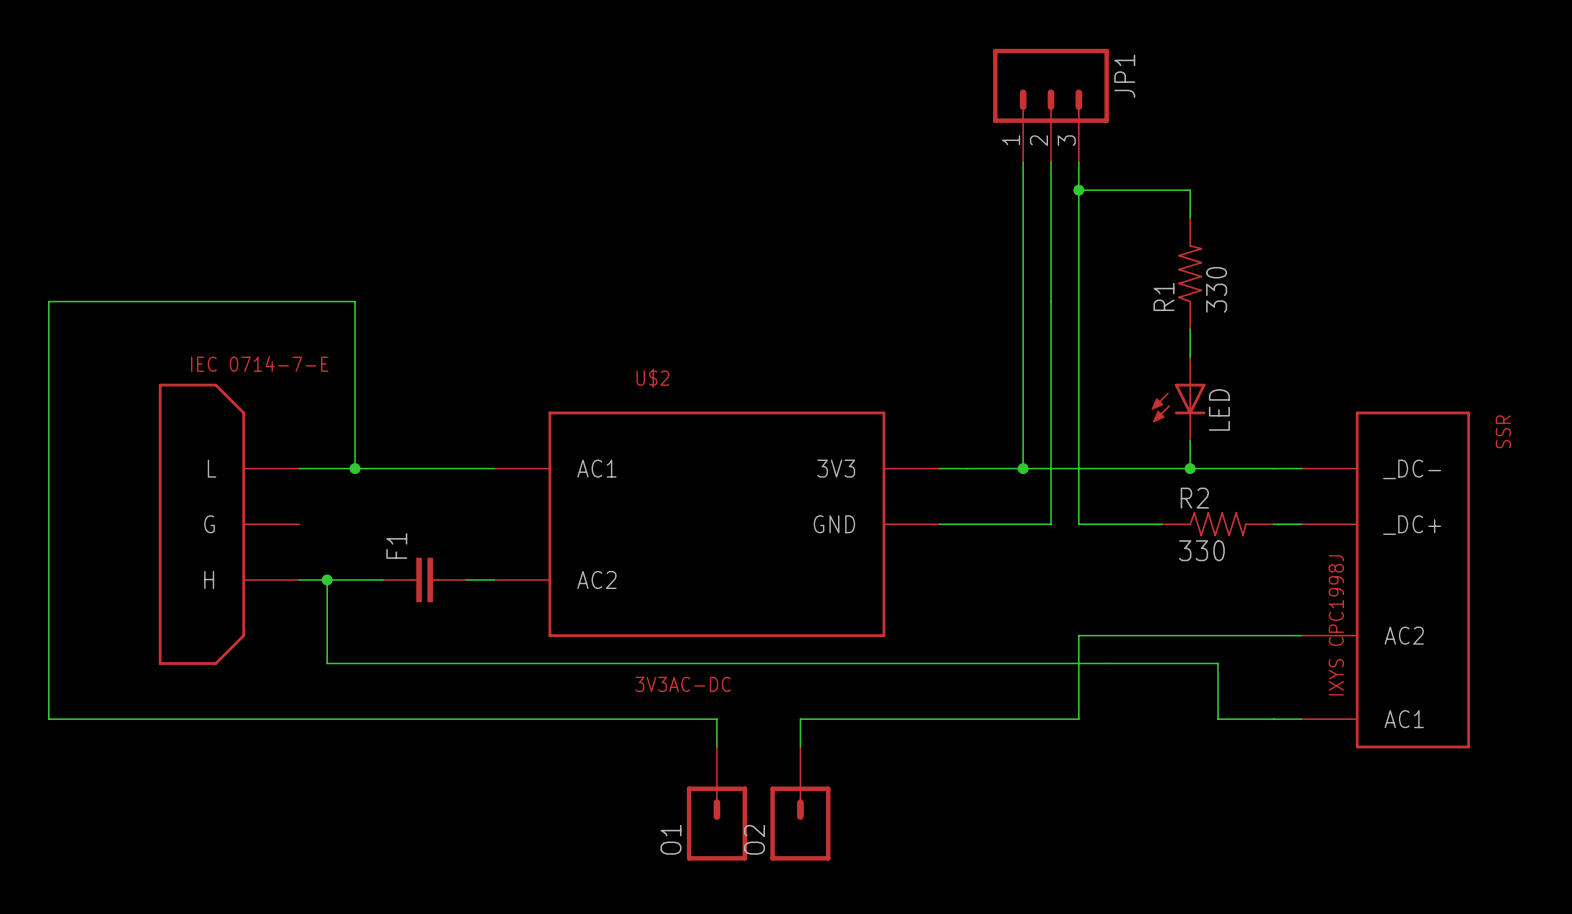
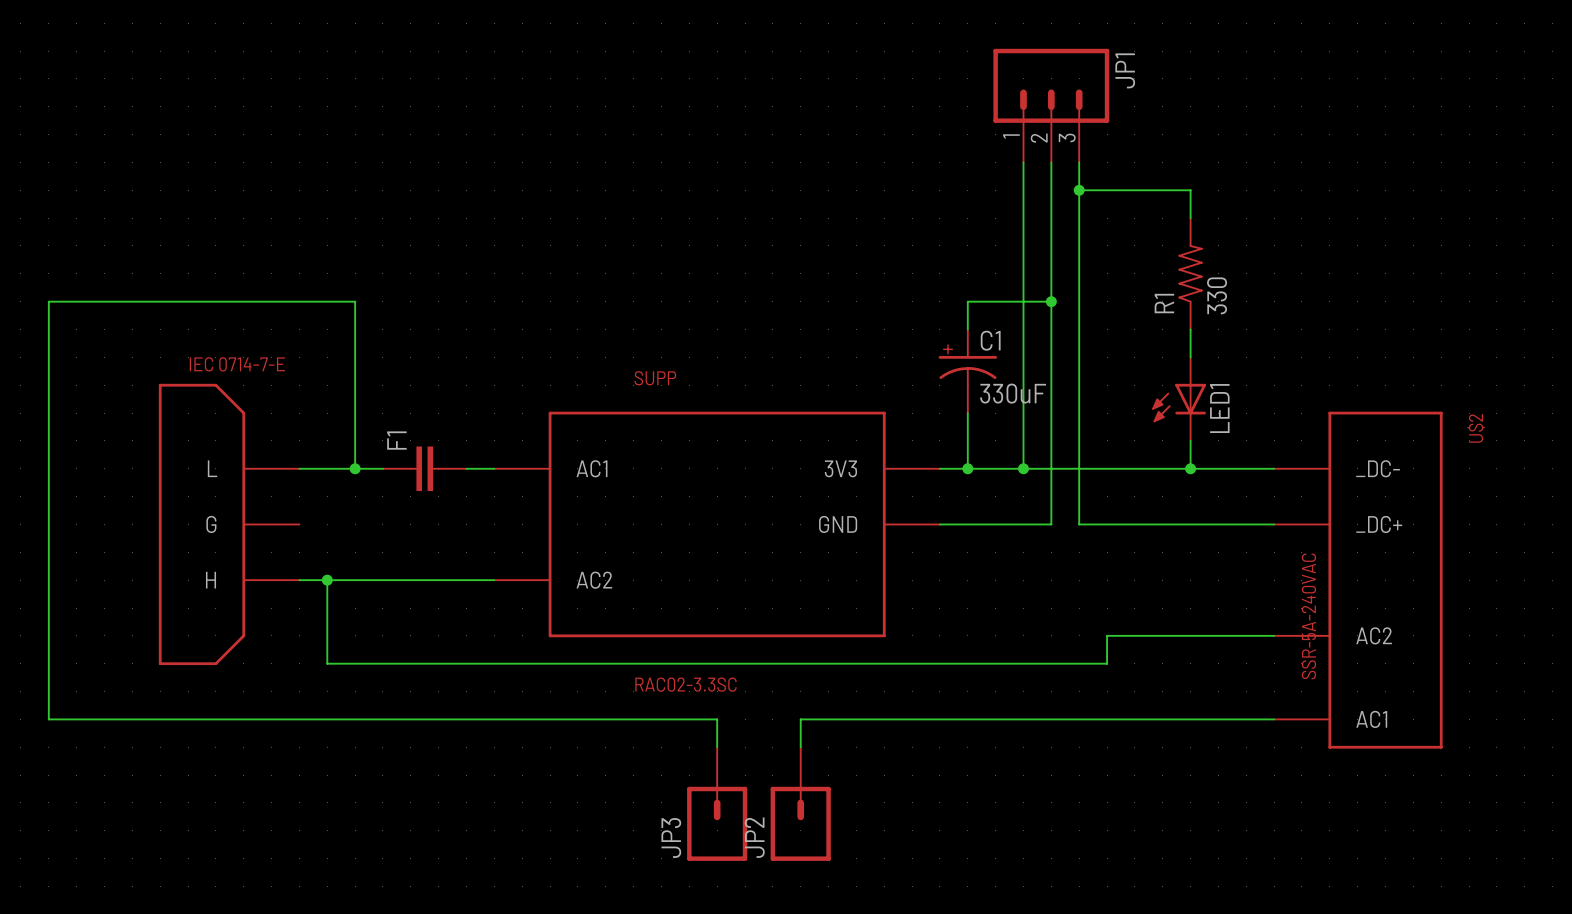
wire: none -> (1051, 301) (967, 301) (967, 329)
junction: none -> (1051, 301)
C1: none -> 330uF (967, 371)
U$2 name: U$2 (652, 378) -> SUPP (655, 378)
LED name: LED (1219, 409) -> LED1 (1219, 408)
wire: none -> (967, 413) (967, 468)
junction: none -> (967, 468)
R2: 330 (1218, 524) -> none
F1 position: (424, 579) -> (424, 468)
U$2: none -> SSR-5A-240VAC (1358, 580)
SSR: IXYS CPC1998J (1385, 579) -> none
wire: (1106, 635) (1078, 635) (1078, 719) -> (1107, 635) (1107, 663)
wire: (1106, 663) (1218, 663) (1218, 719) -> (1079, 719) (1218, 719)
U$2 value: 3V3AC-DC (683, 684) -> RAC02-3.3SC (685, 684)
O1 name: O1 (670, 839) -> JP3 (671, 837)
O2 name: O2 (754, 839) -> JP2 (754, 837)

